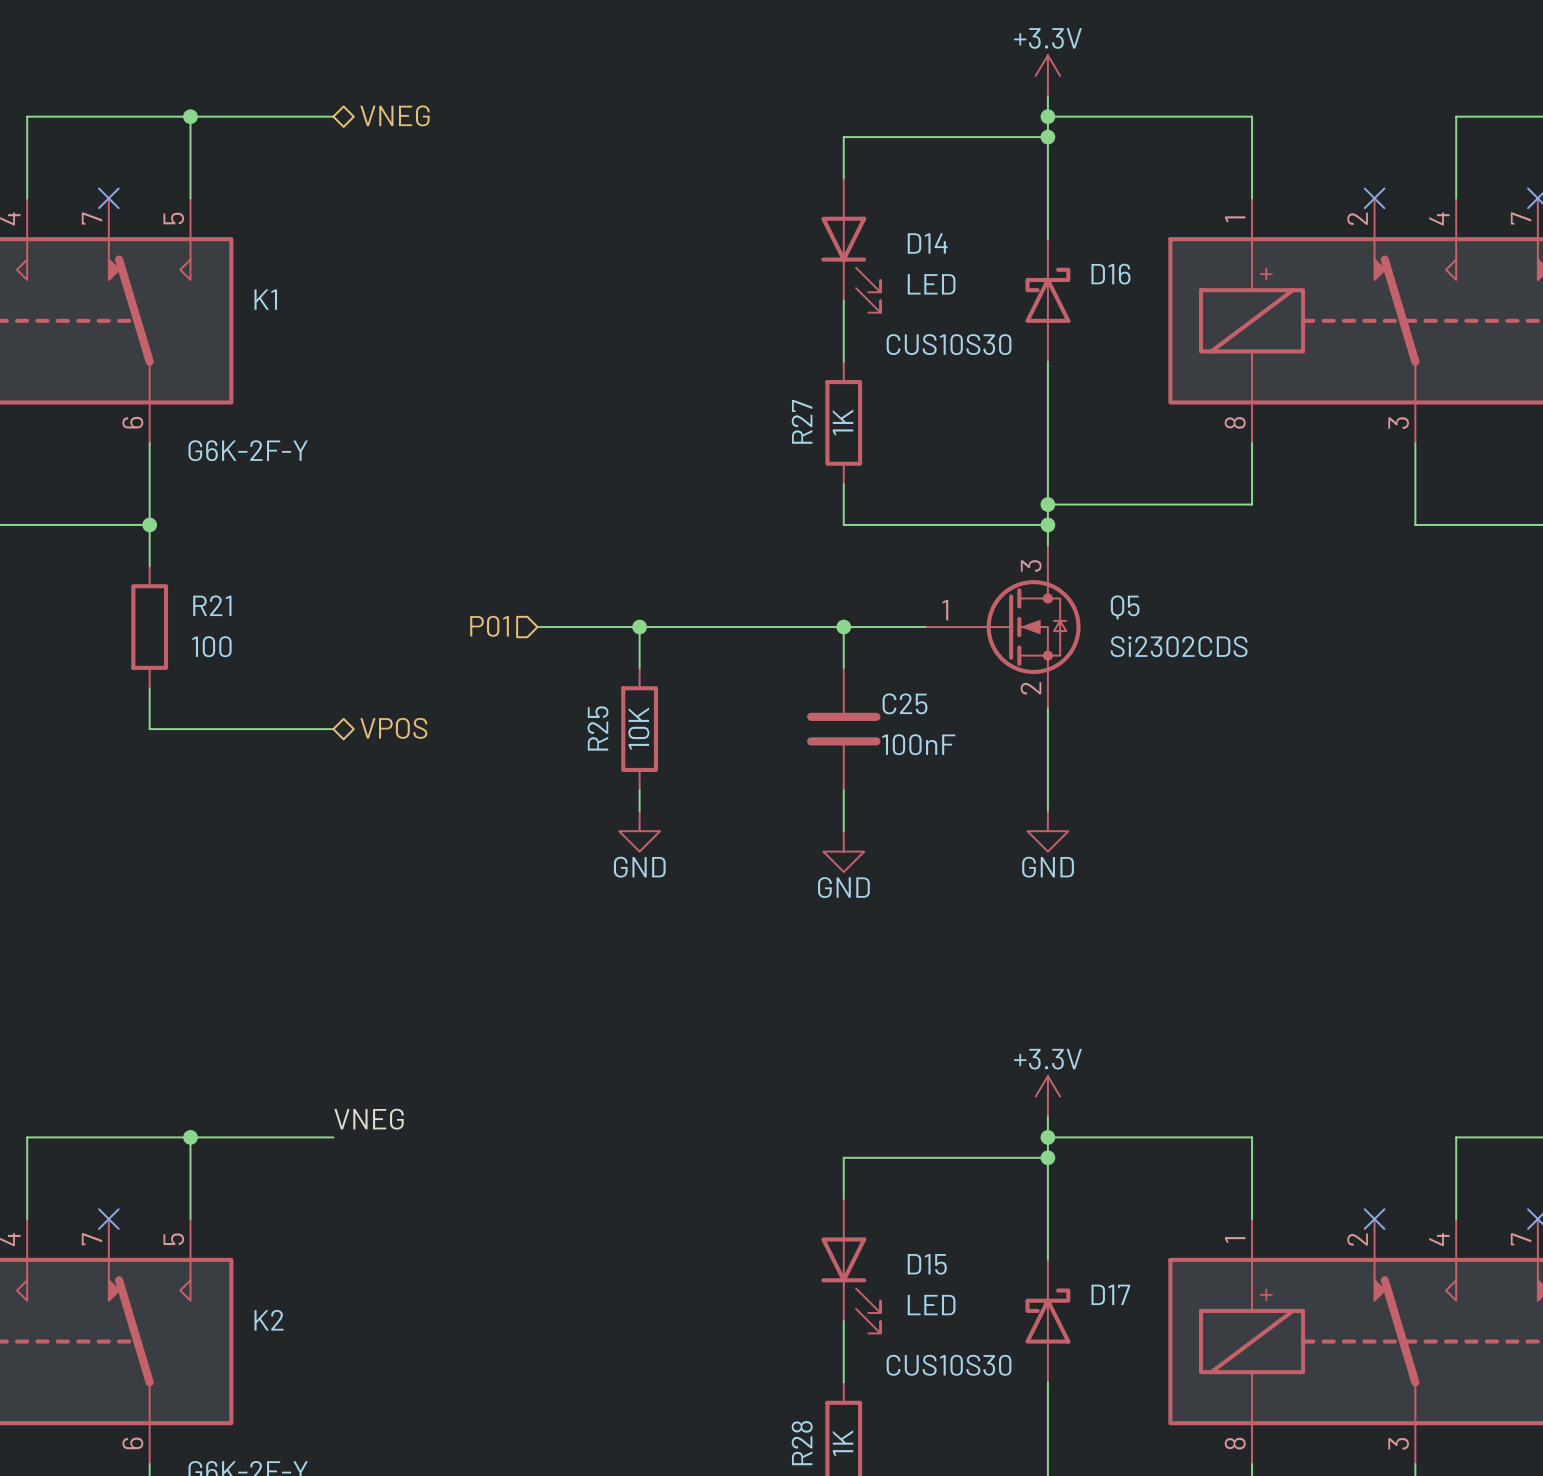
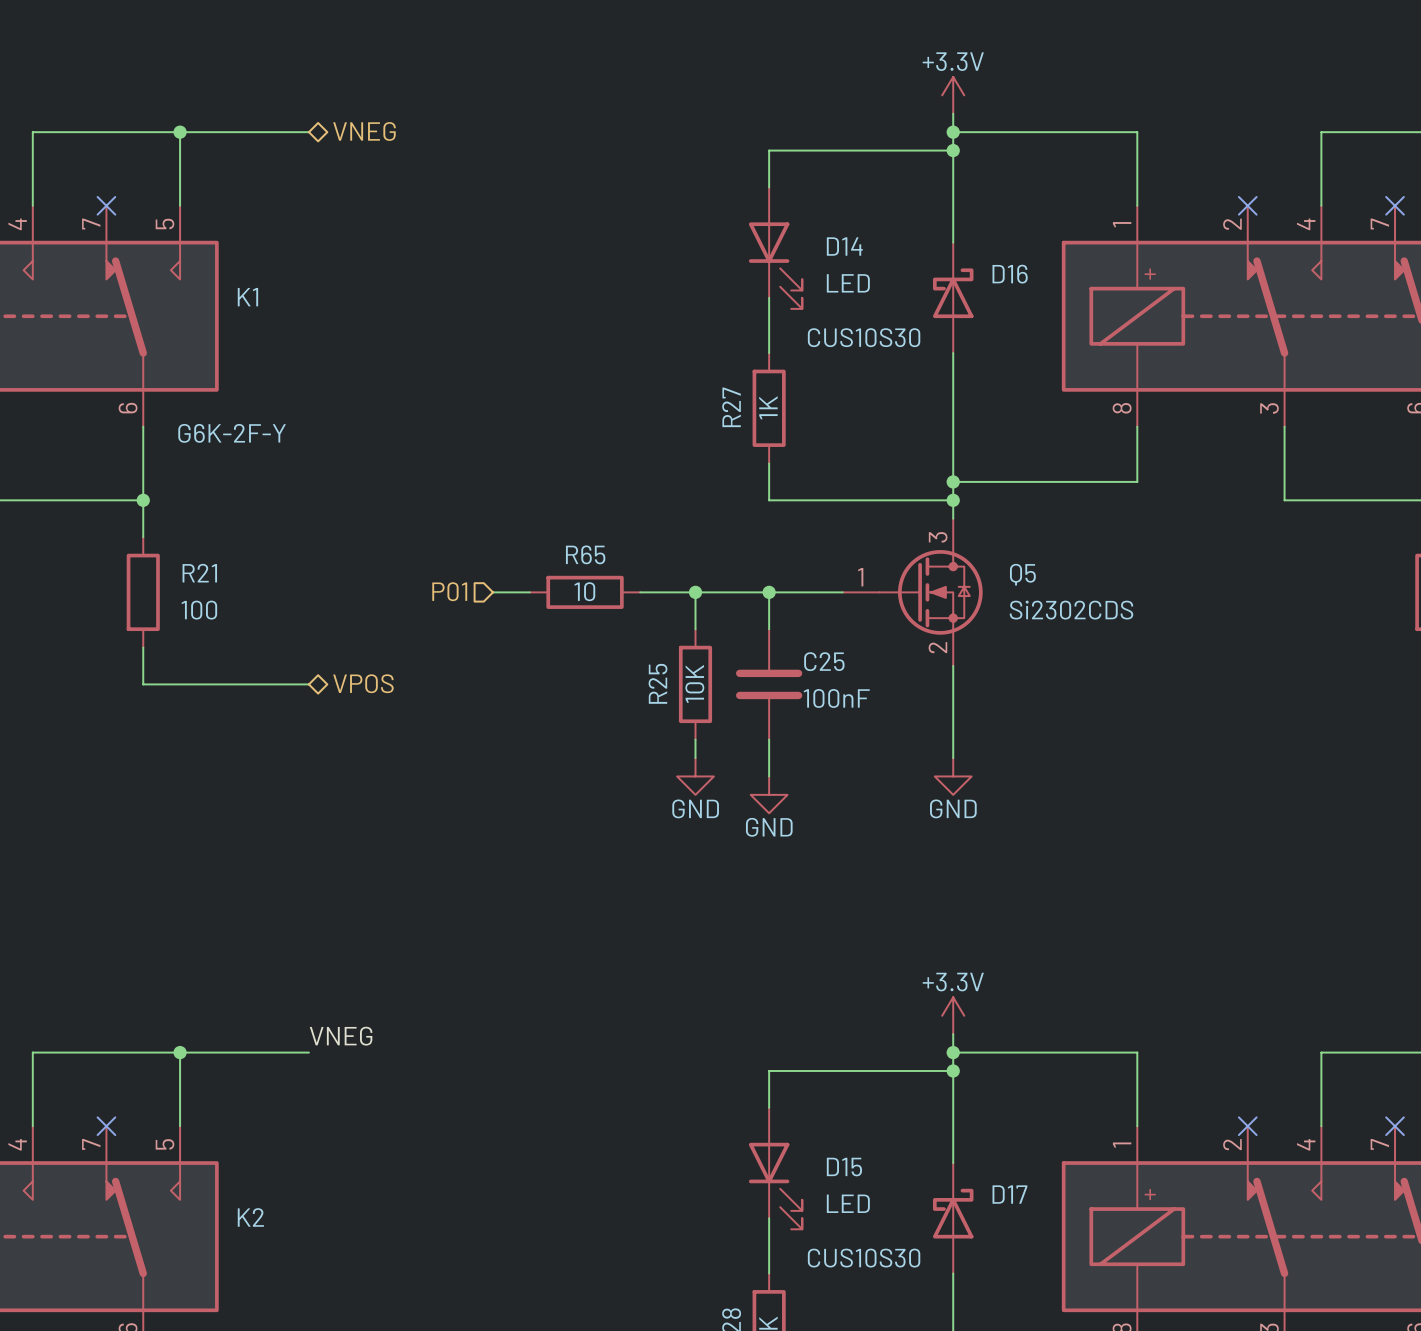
wire: (578, 627) (700, 627) -> none
wire: (639, 627) (639, 667) -> (695, 592) (695, 629)
junction: (639, 627) -> none
R65: none -> 10 (585, 592)
junction: none -> (695, 592)
R25 position: (639, 729) -> (695, 684)
wire: (639, 790) (639, 810) -> (695, 739) (695, 758)
power symbol position: GND (639, 831) -> GND (695, 776)

